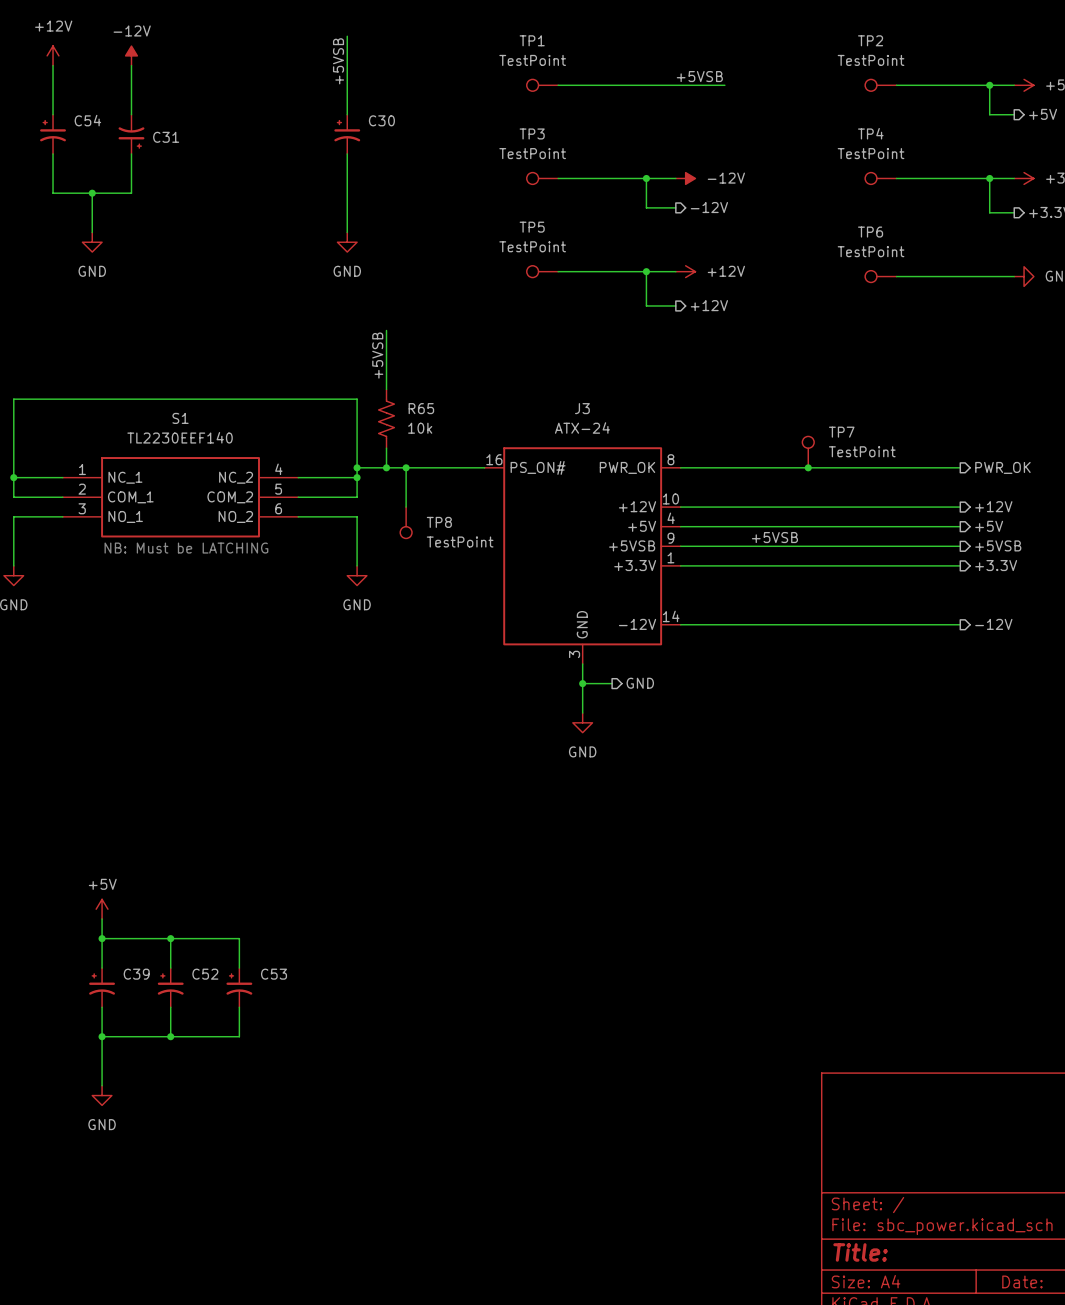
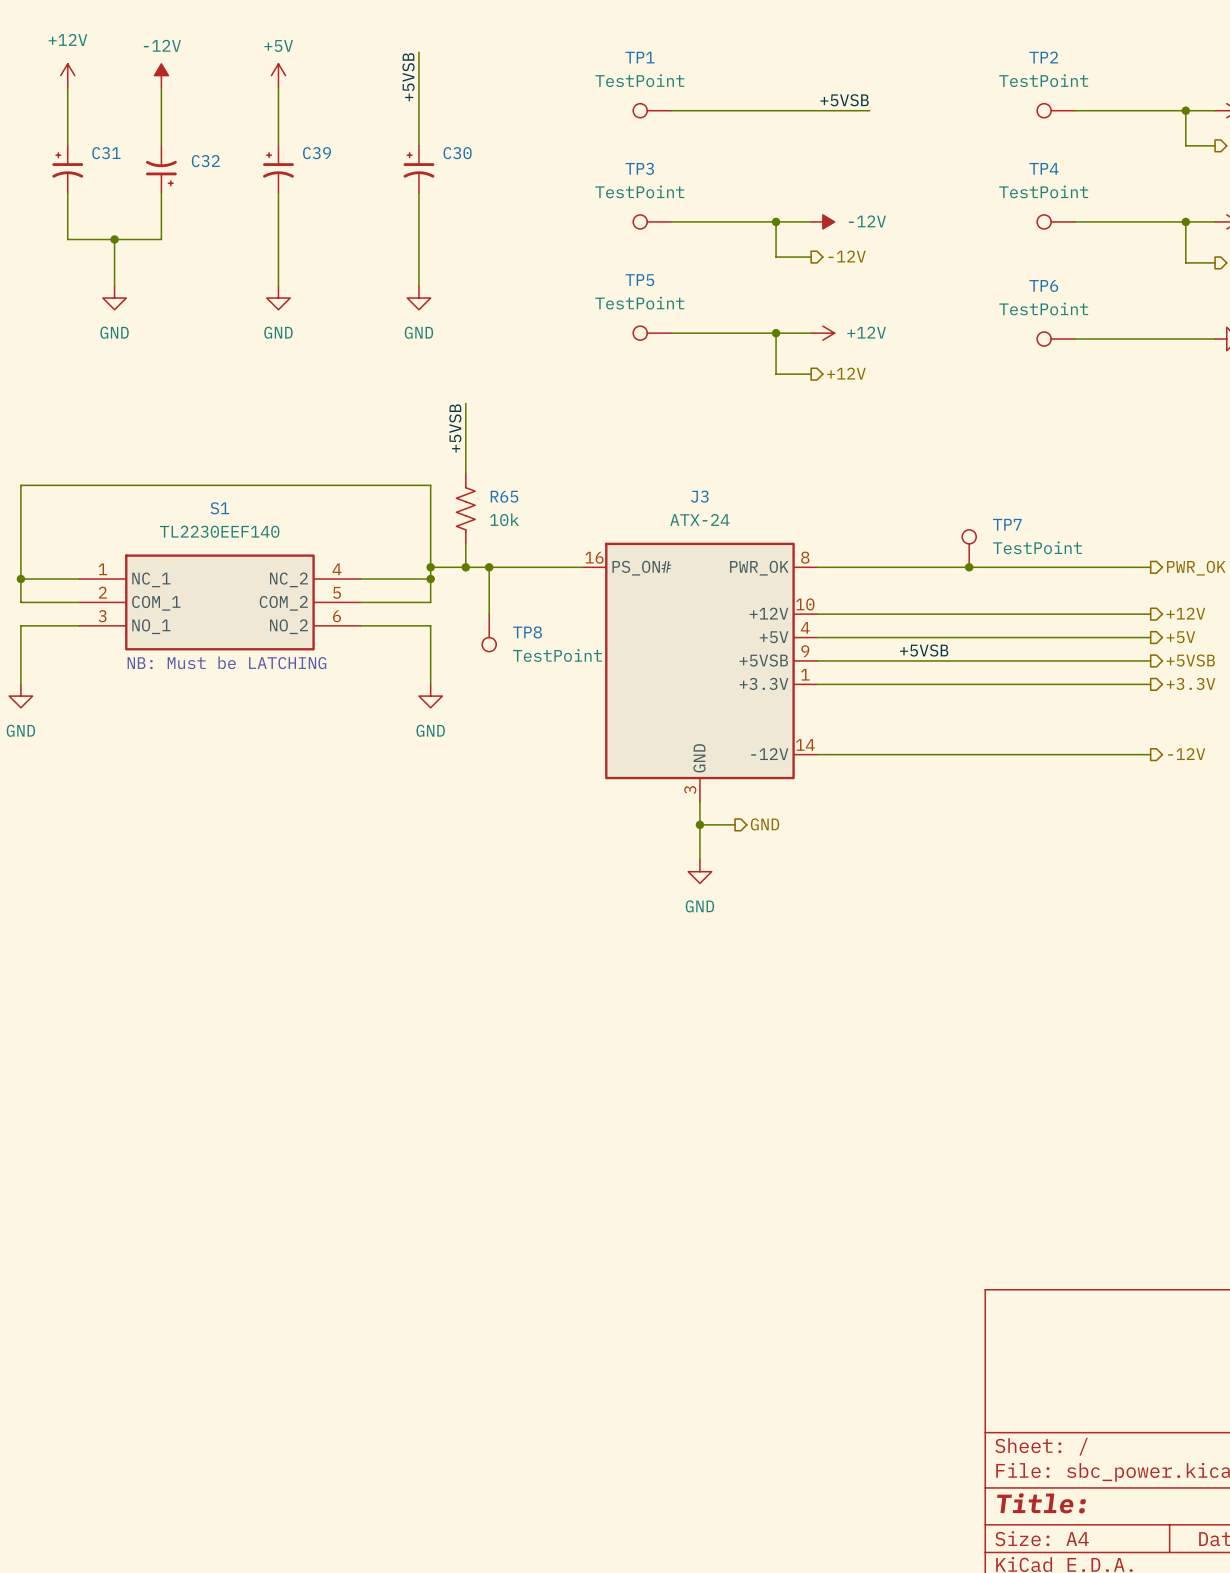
power symbol: none -> +5V (278, 75)
wire: none -> (278, 87) (278, 145)
C54 name: C54 (87, 120) -> C31 (106, 153)
C31 name: C31 (166, 137) -> C32 (205, 161)
wire: none -> (278, 192) (278, 286)
power symbol: none -> GND (278, 298)
power symbol: +5V (102, 909) -> none
wire: (102, 919) (102, 968) -> none
wire: (102, 938) (239, 938) (239, 968) -> none
junction: (102, 938) -> none
wire: (170, 938) (170, 968) -> none
junction: (170, 938) -> none
C39 position: (102, 987) -> (278, 169)
C52: (170, 987) -> none
C53: (239, 987) -> none
wire: (102, 1007) (102, 1085) -> none
wire: (170, 1007) (170, 1036) -> none
wire: (239, 1007) (239, 1036) (102, 1036) -> none
junction: (102, 1036) -> none
junction: (170, 1036) -> none
power symbol: GND (102, 1095) -> none

